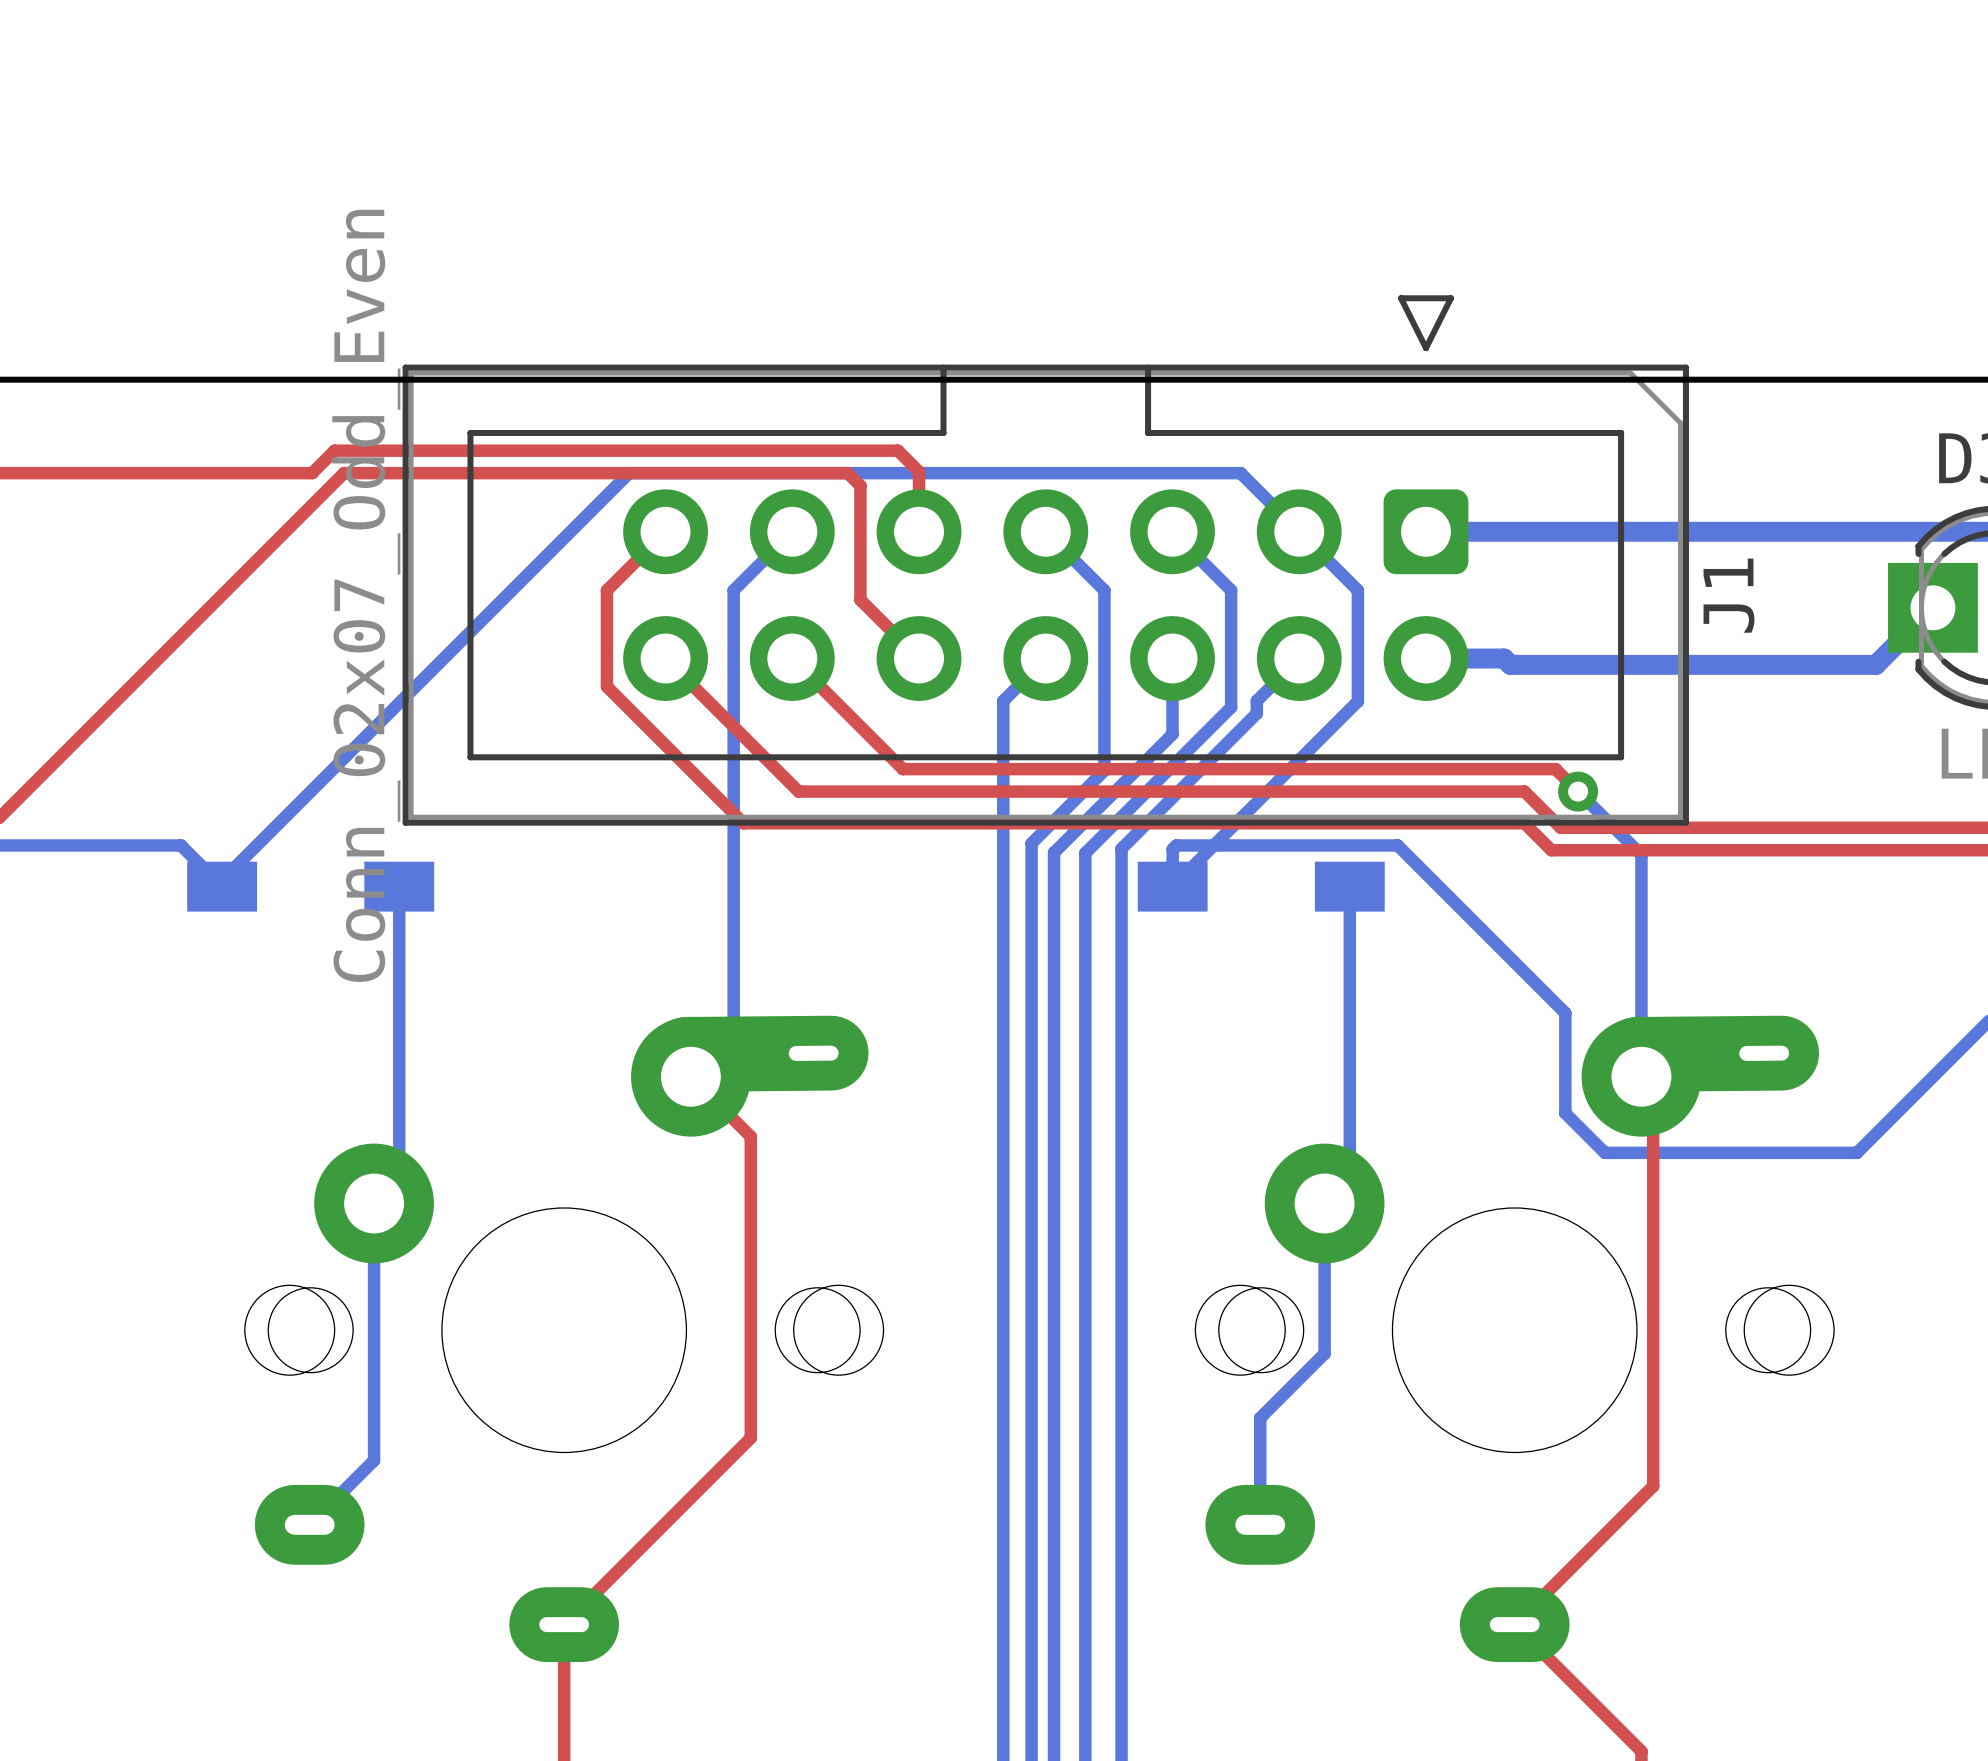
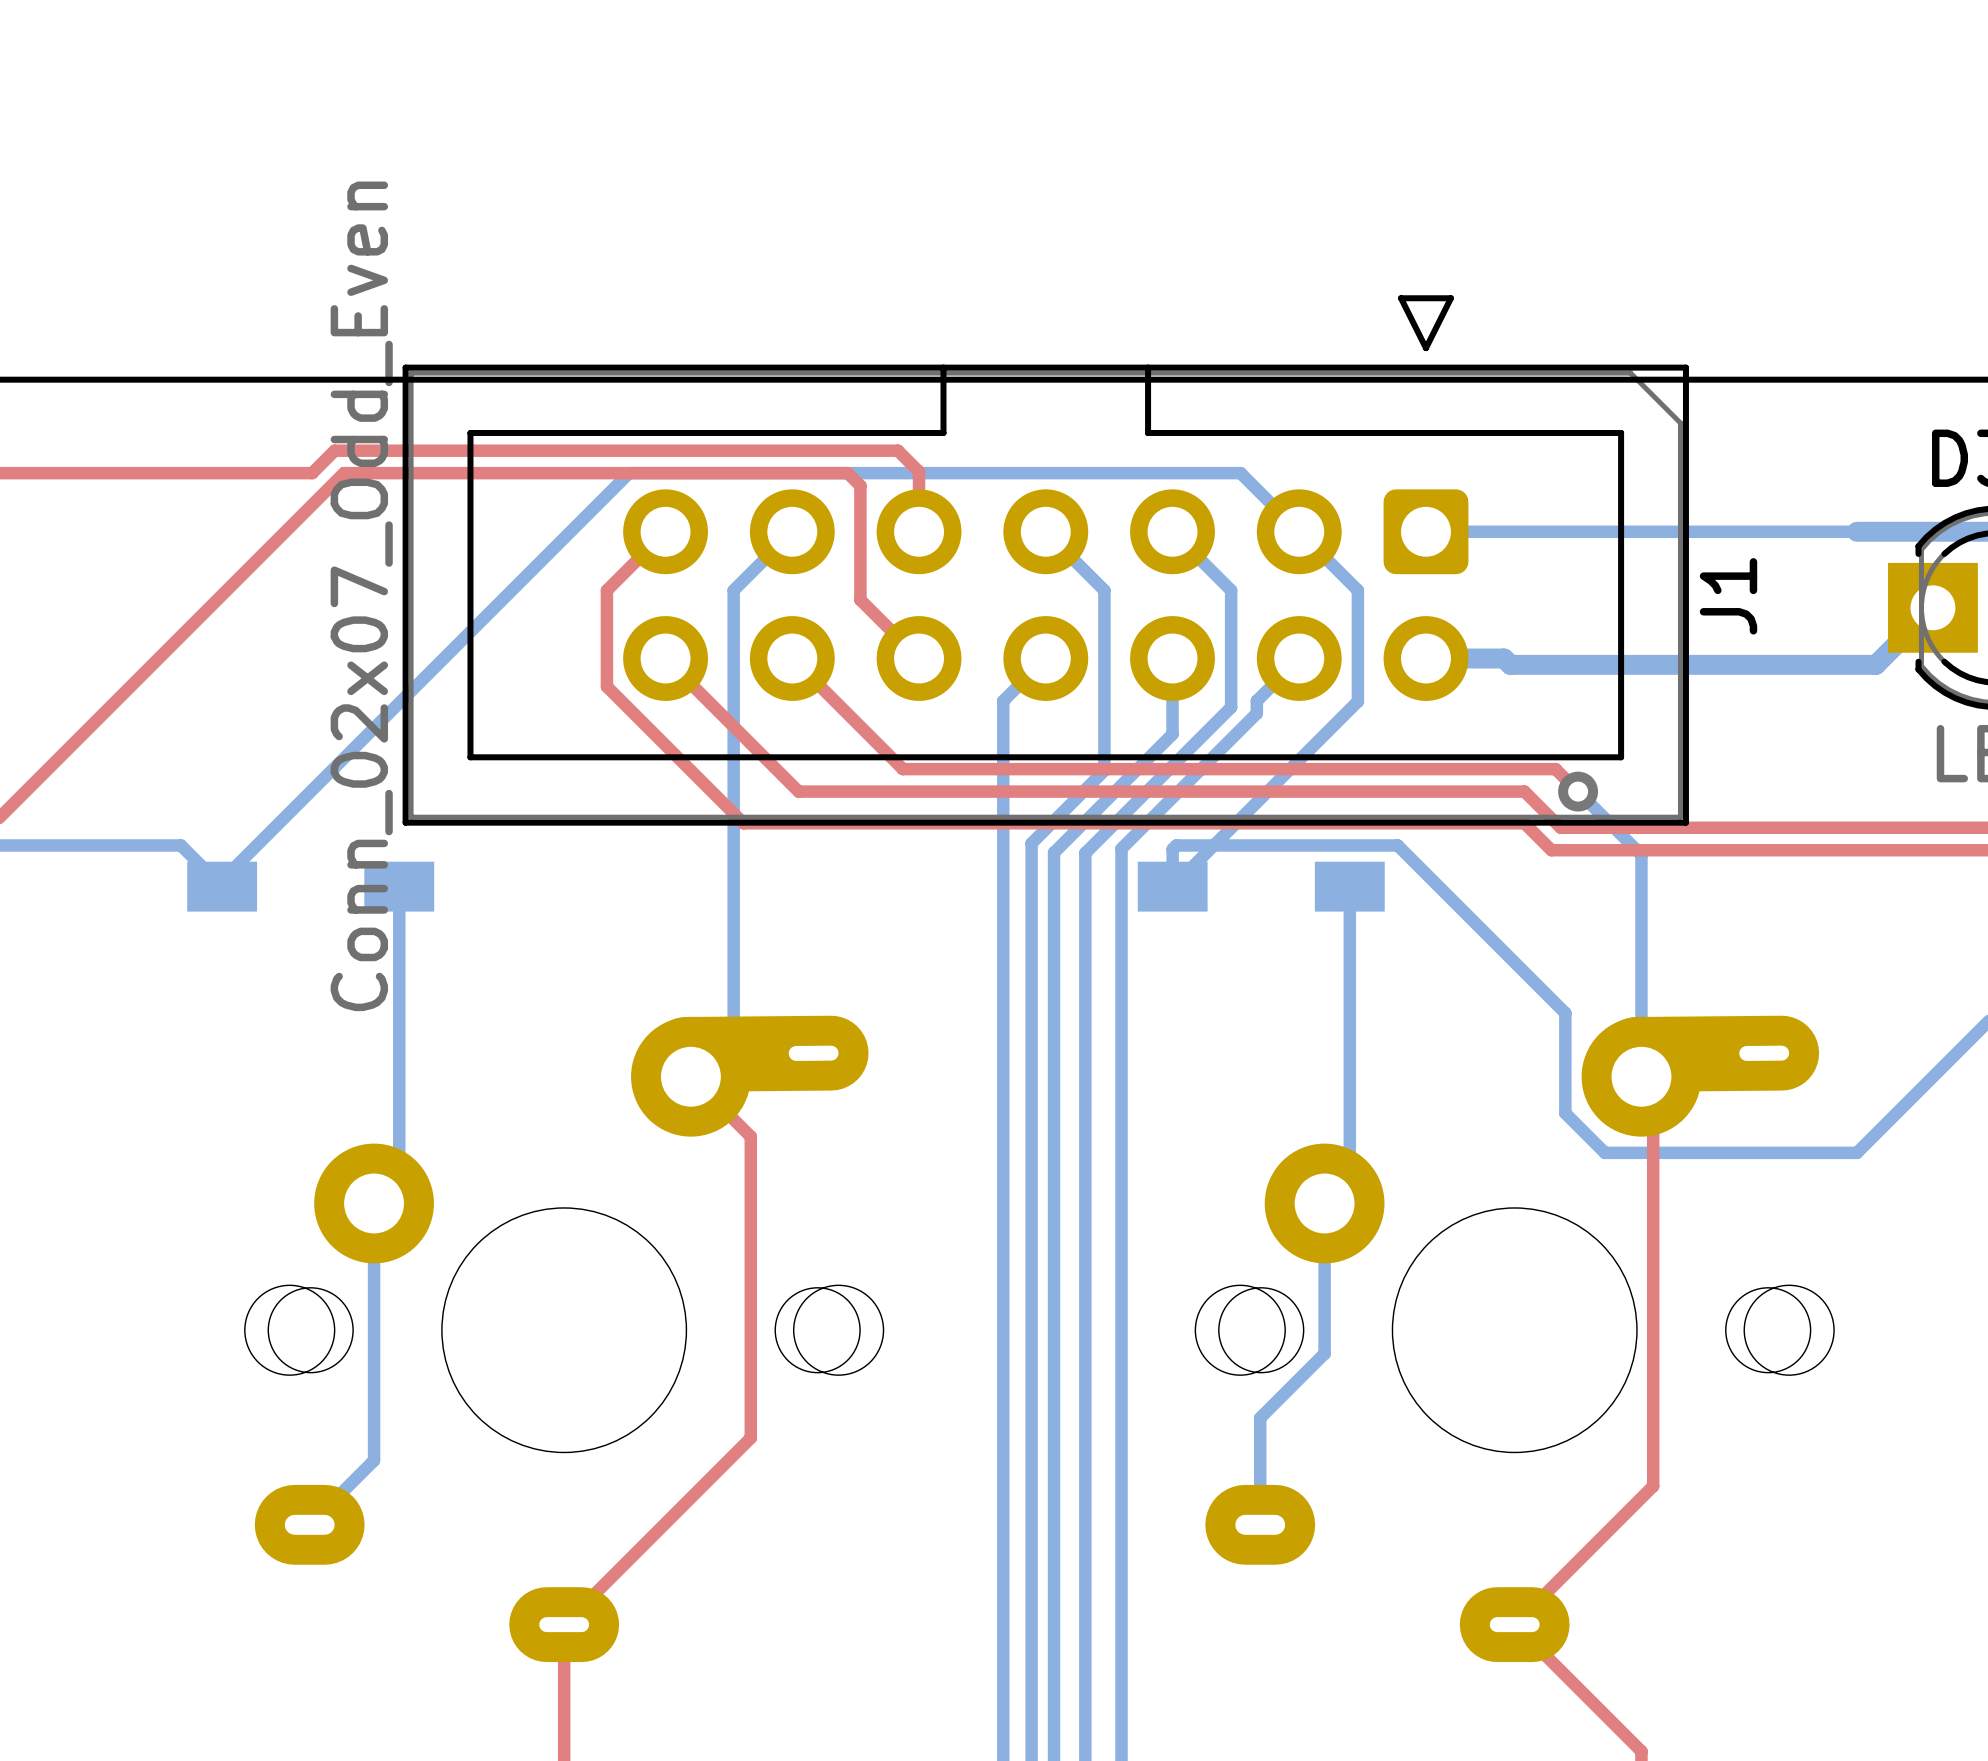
bottom track width: thick (1426, 531) (1856, 531) -> thin (1426, 531) (1856, 531)

